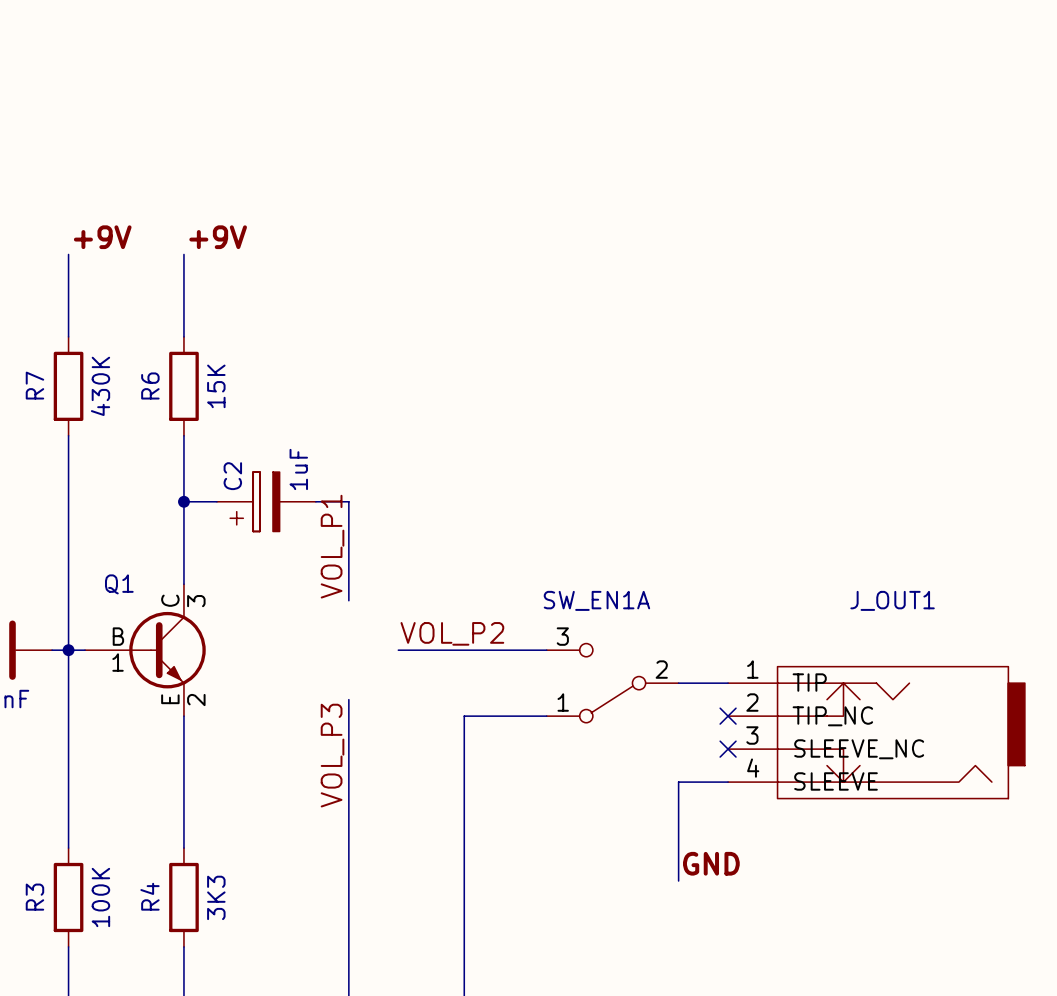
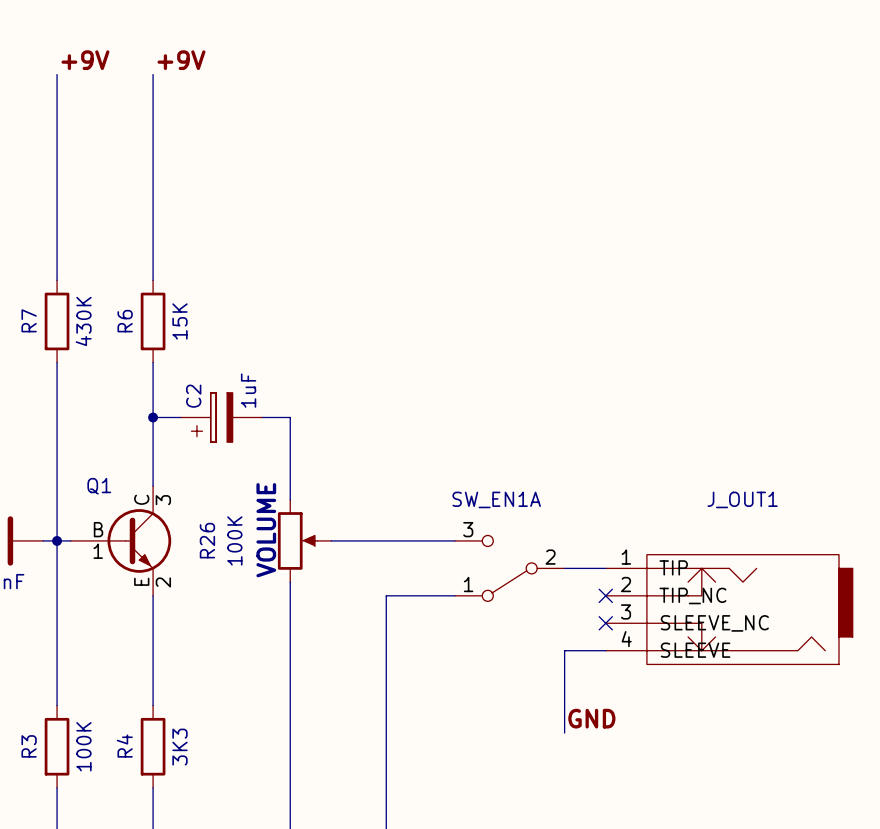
label: none -> +9V (85, 60)
label: none -> +9V (181, 60)
wire: none -> (57, 74) (57, 211)
wire: none -> (153, 74) (153, 211)
label: +9V (102, 237) -> none
label: +9V (218, 237) -> none
label: VOL_P1 (332, 546) -> none
label: VOL_P2 (452, 633) -> none
text: none -> VOLUME (266, 530)
R26: none -> 100K (304, 540)
label: VOL_P3 (332, 755) -> none

